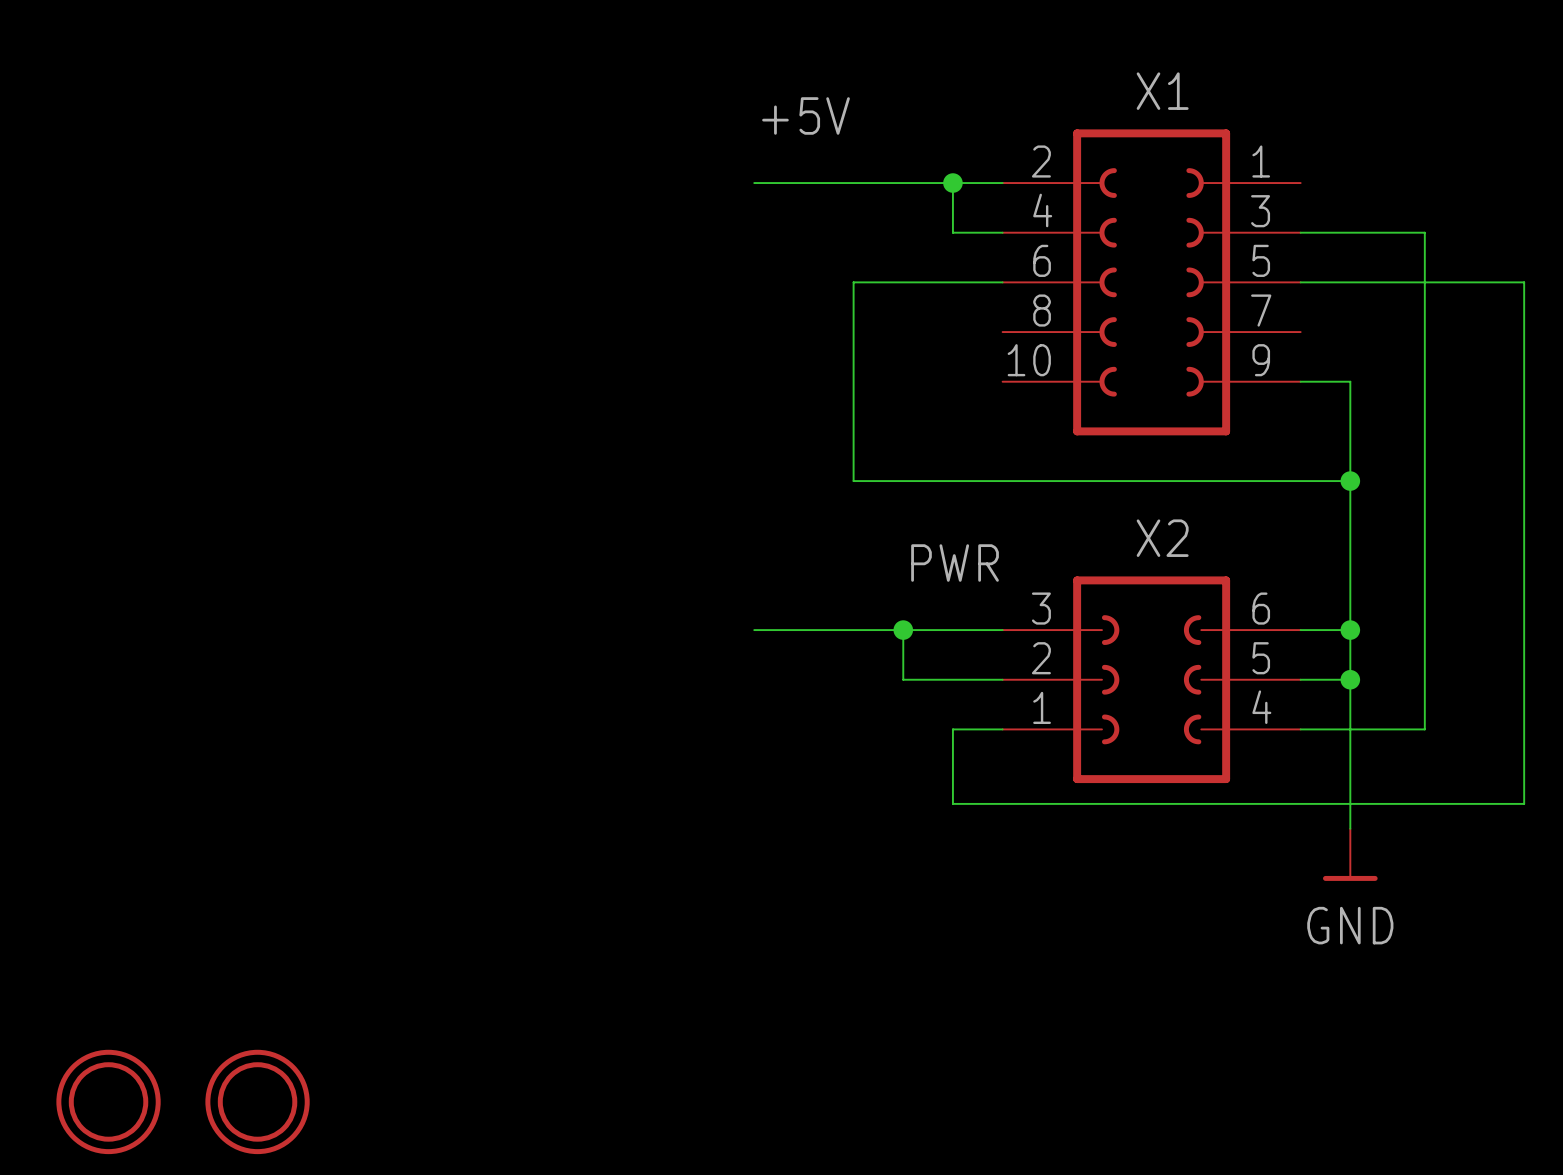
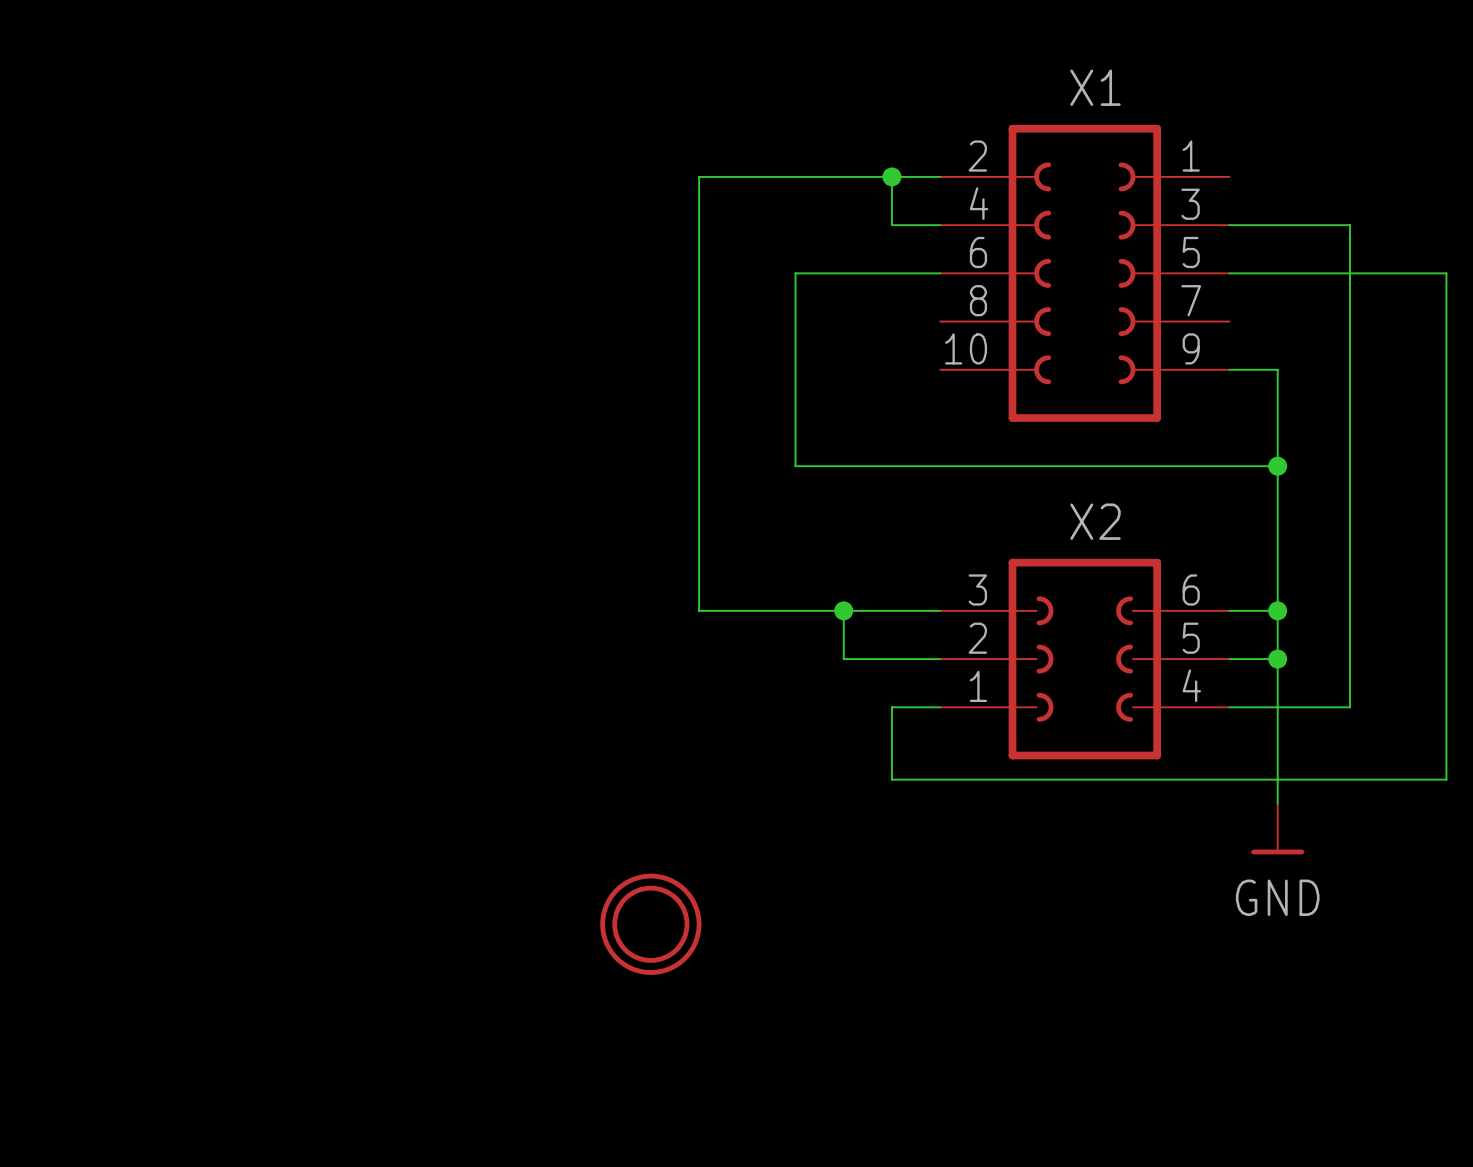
label: +5V (806, 115) -> none
wire: none -> (699, 176) (699, 610)
label: PWR (955, 563) -> none
part: none -> (650, 924)
part: (108, 1101) -> none
part: (257, 1101) -> none

